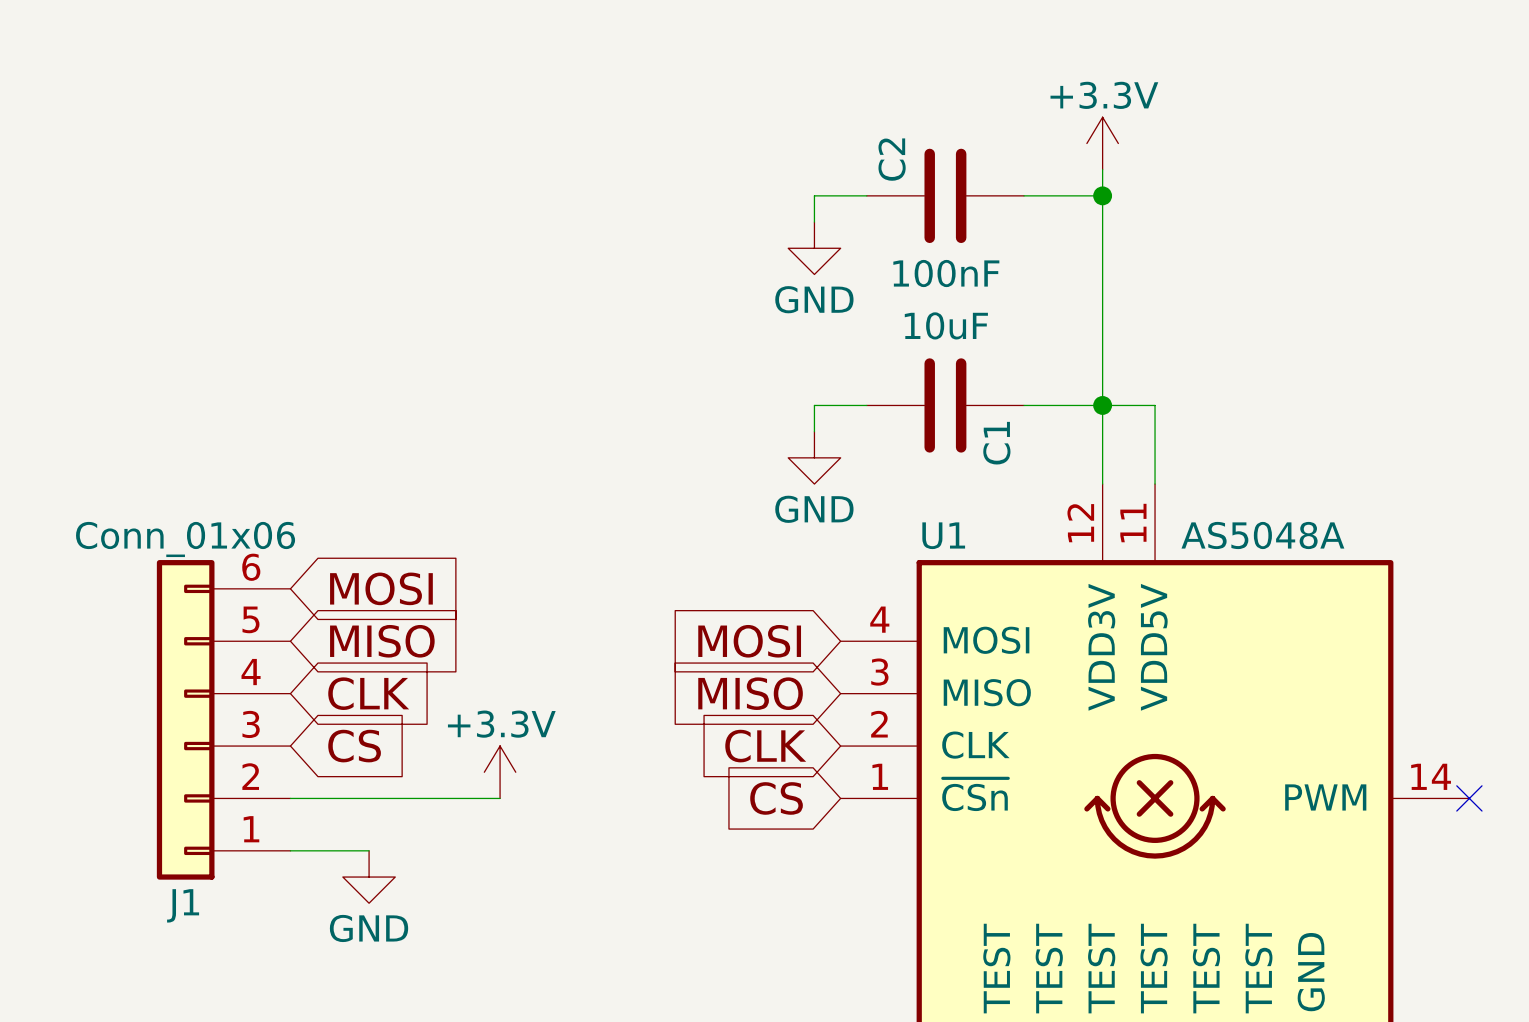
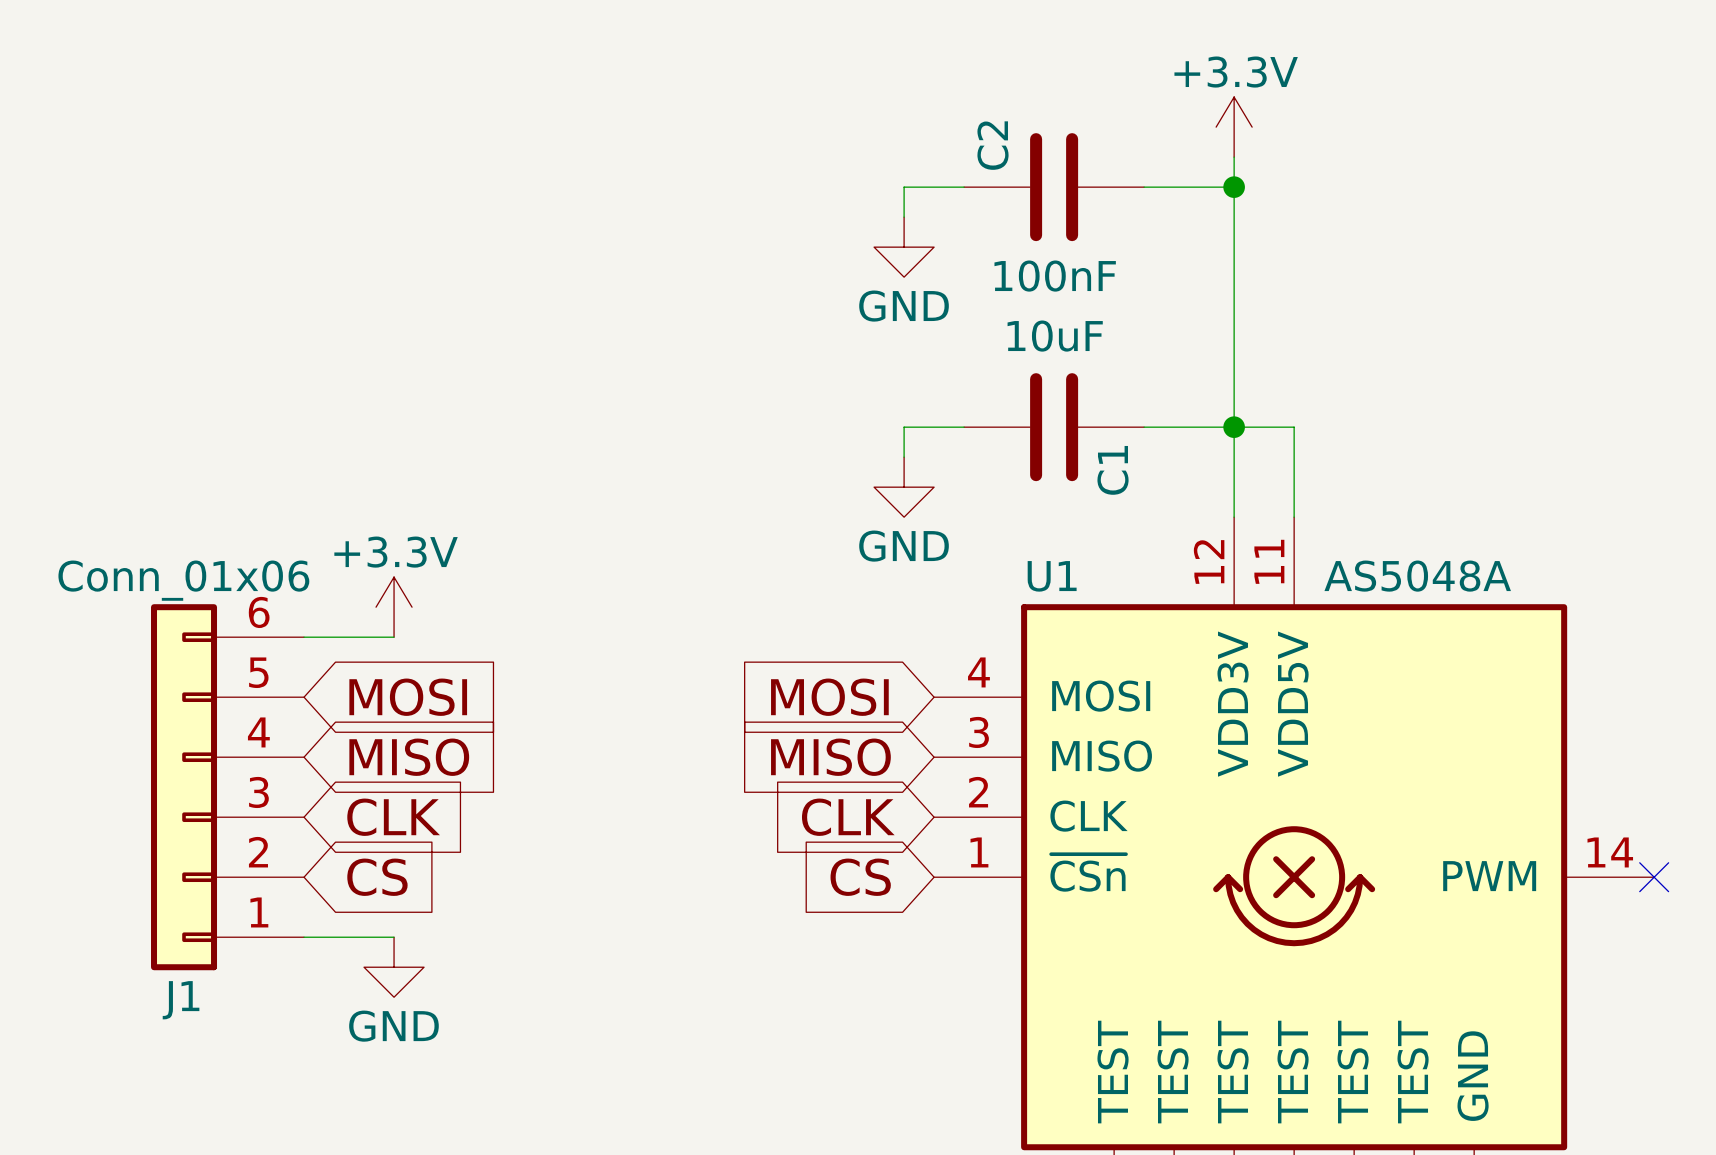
wire: none -> (304, 637) (394, 637)
global label: MOSI (381, 588) -> none
global label: MISO (382, 641) -> MOSI (408, 697)
global label: CLK (368, 693) -> MISO (409, 757)
global label: CS (354, 746) -> CLK (393, 817)
power symbol position: +3.3V (500, 772) -> +3.3V (394, 607)
wire: (290, 798) (500, 798) -> none
global label: none -> CS (377, 877)

